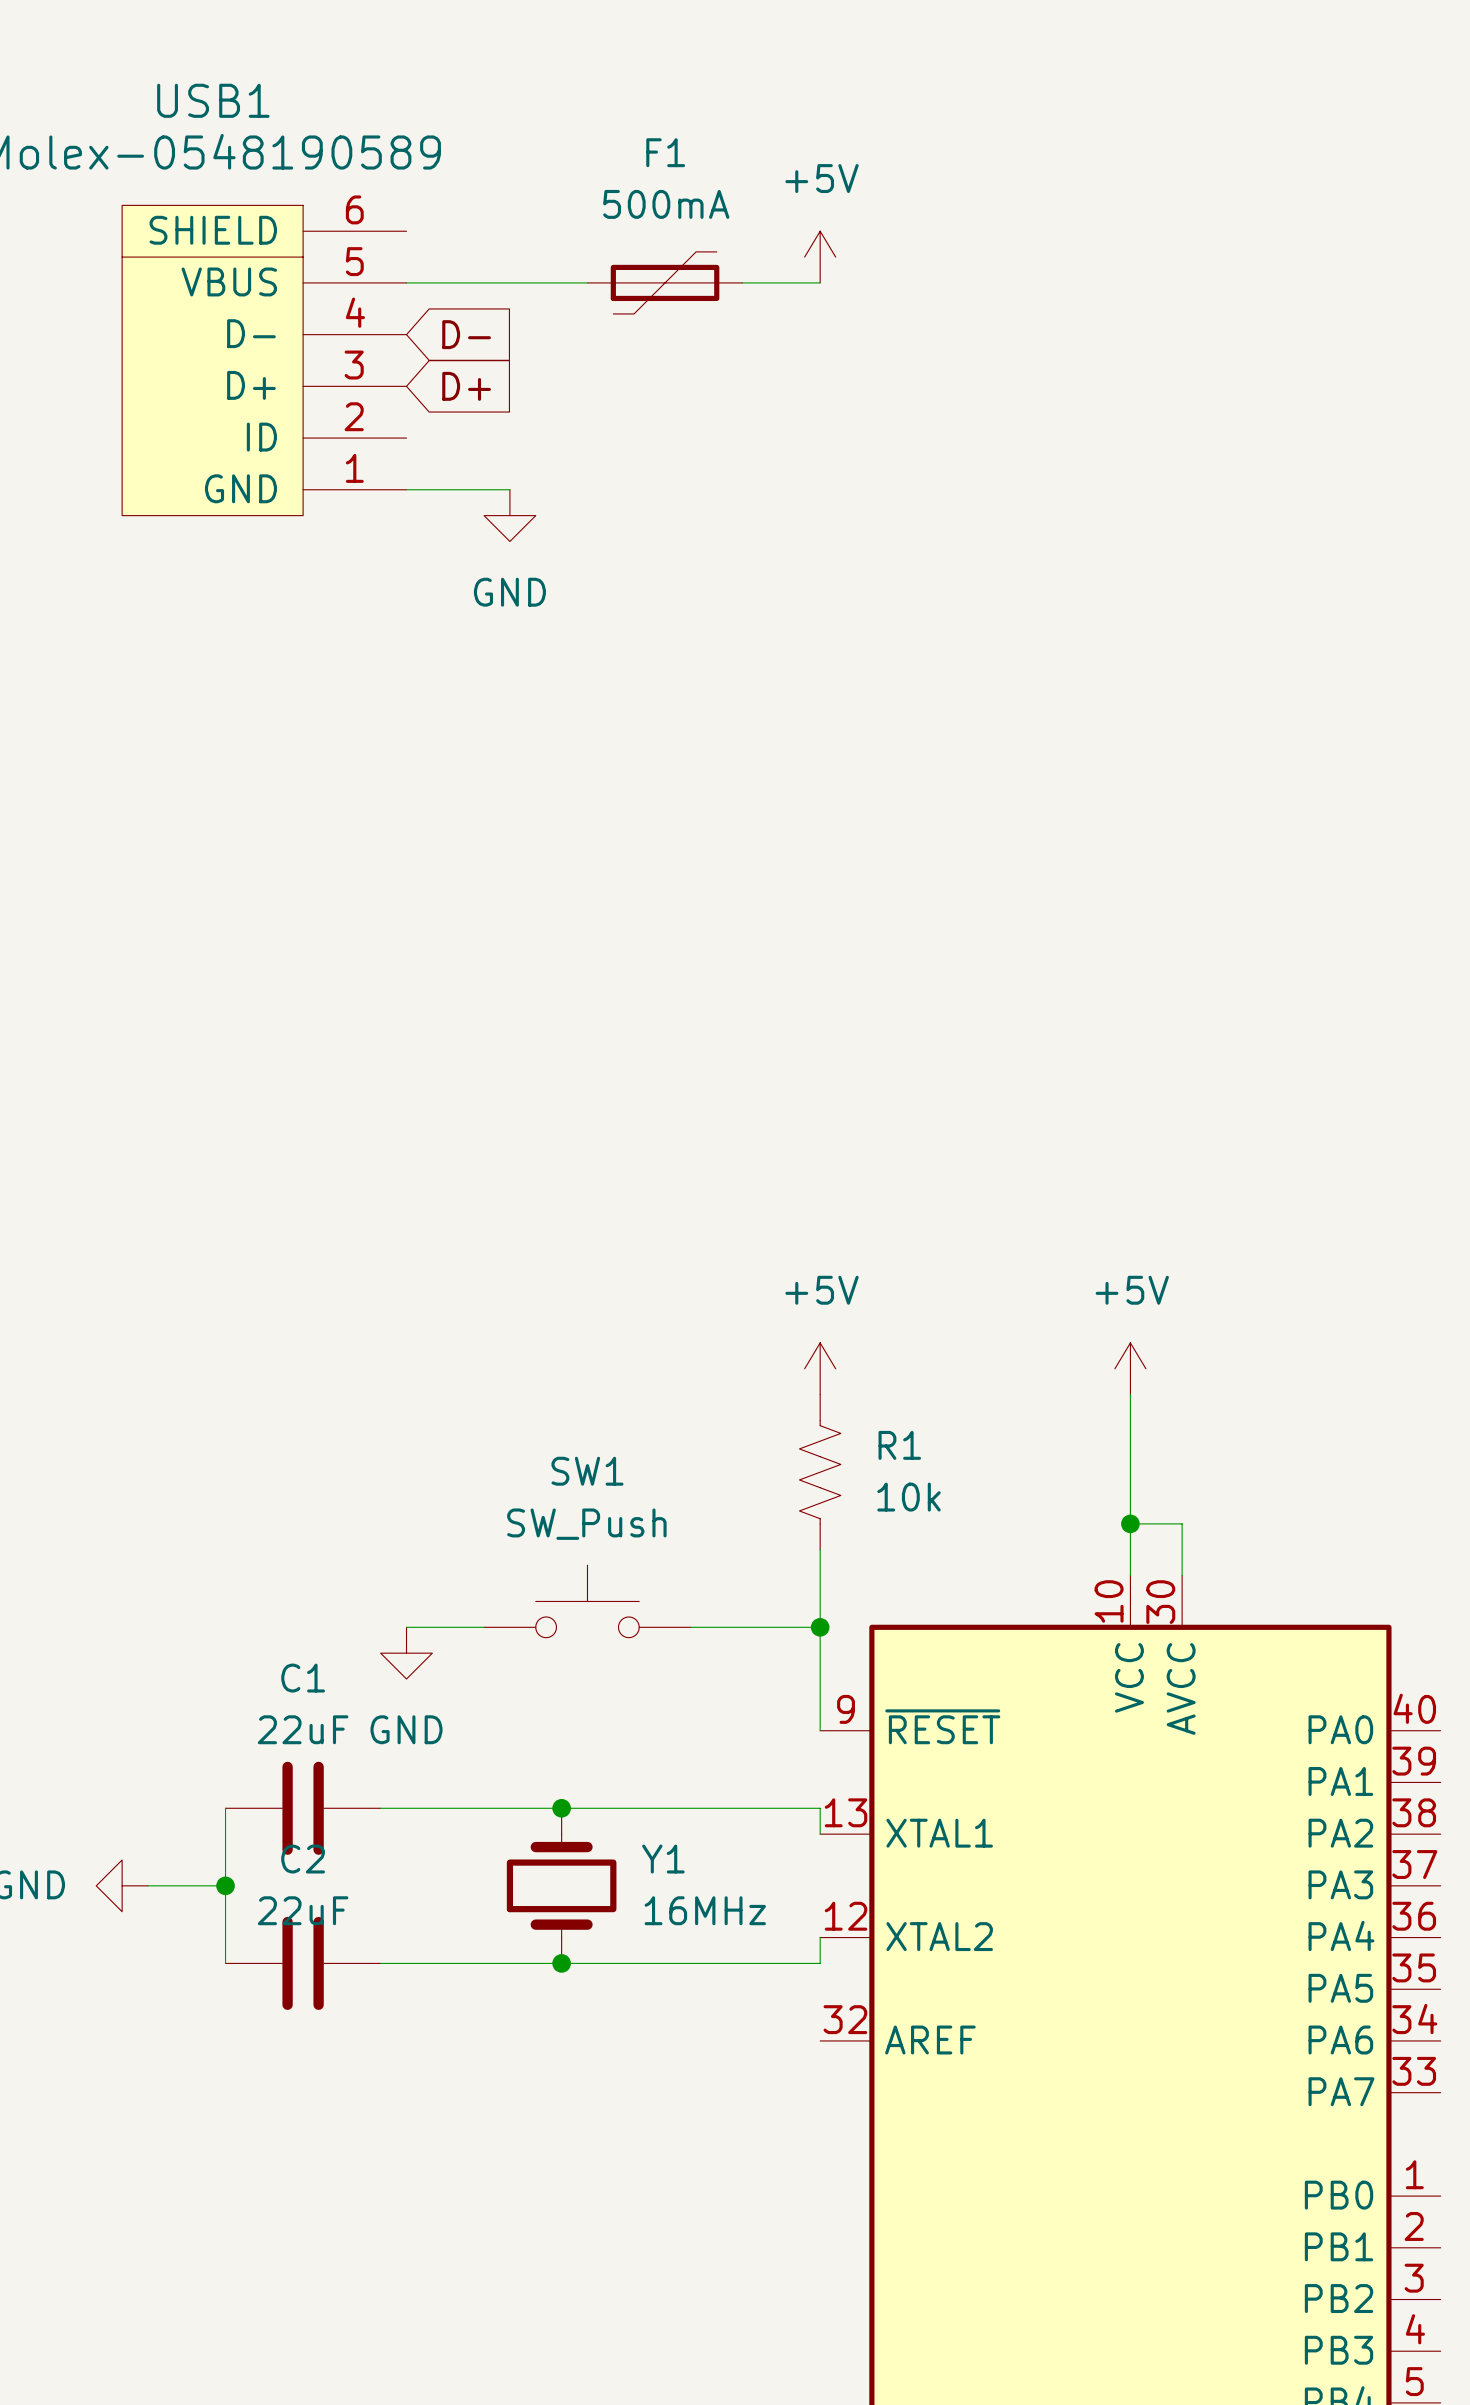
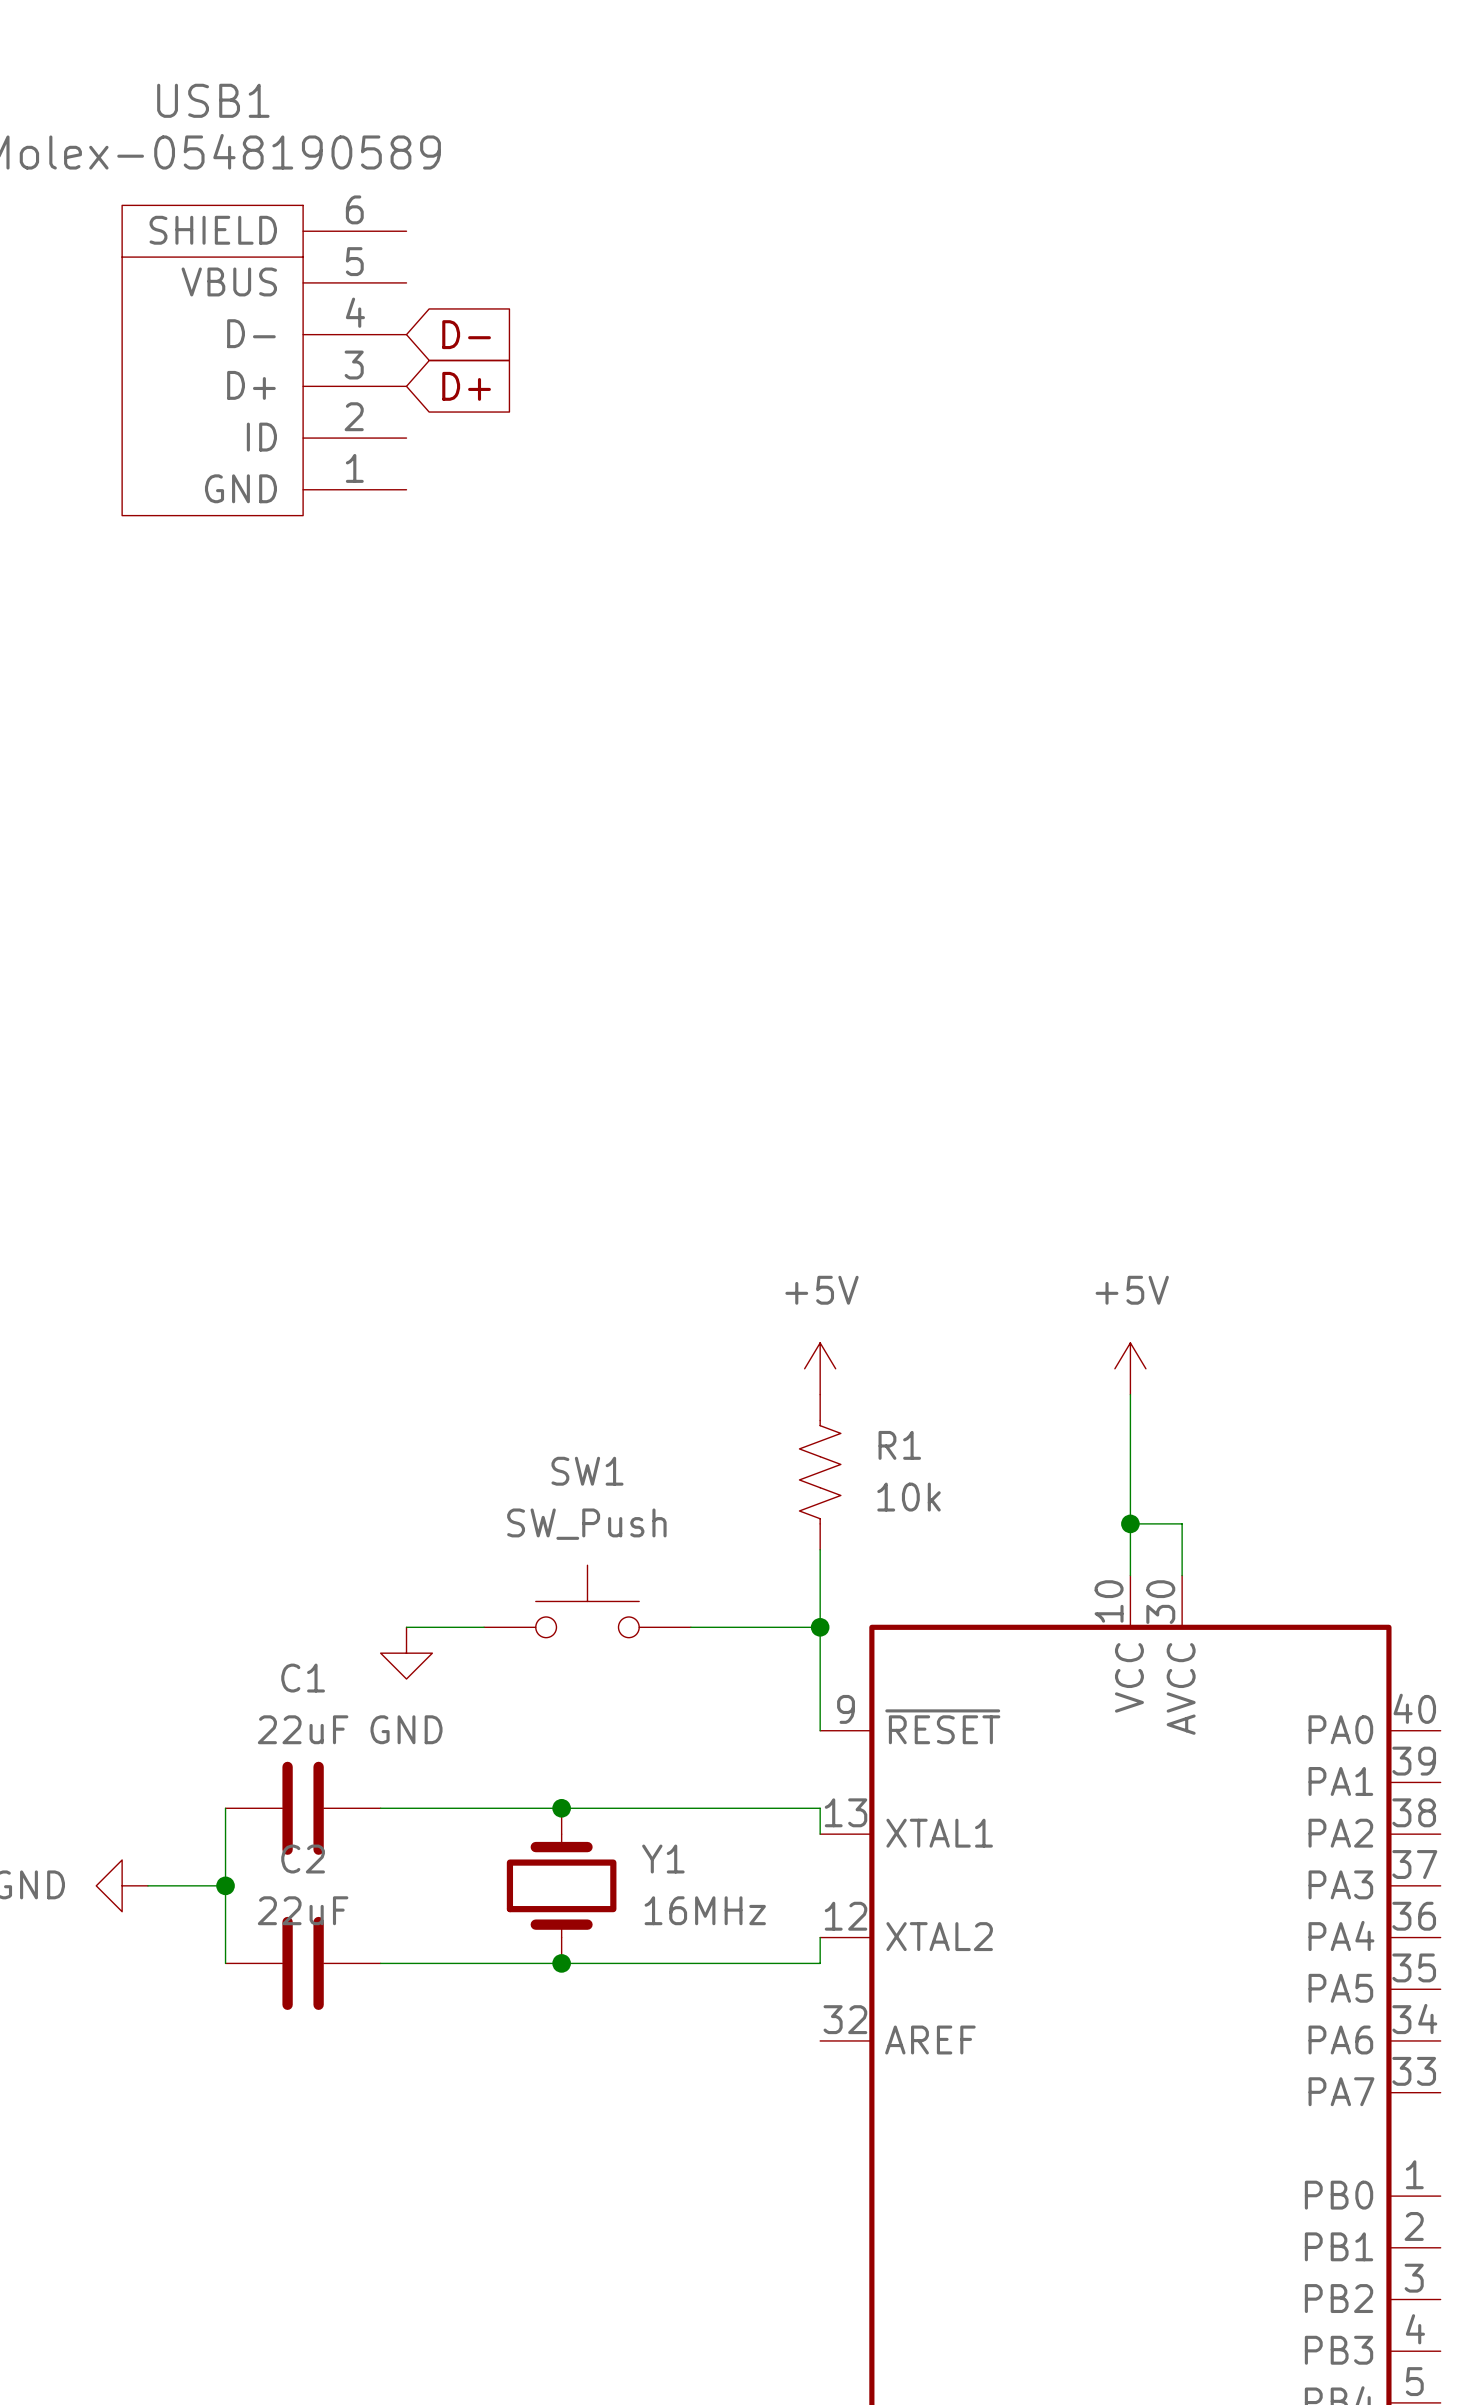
power symbol: +5V (820, 257) -> none
wire: (406, 282) (587, 282) -> none
F1: 500mA (665, 282) -> none
wire: (742, 282) (820, 282) -> none
wire: (406, 489) (509, 489) -> none
power symbol: GND (509, 515) -> none

